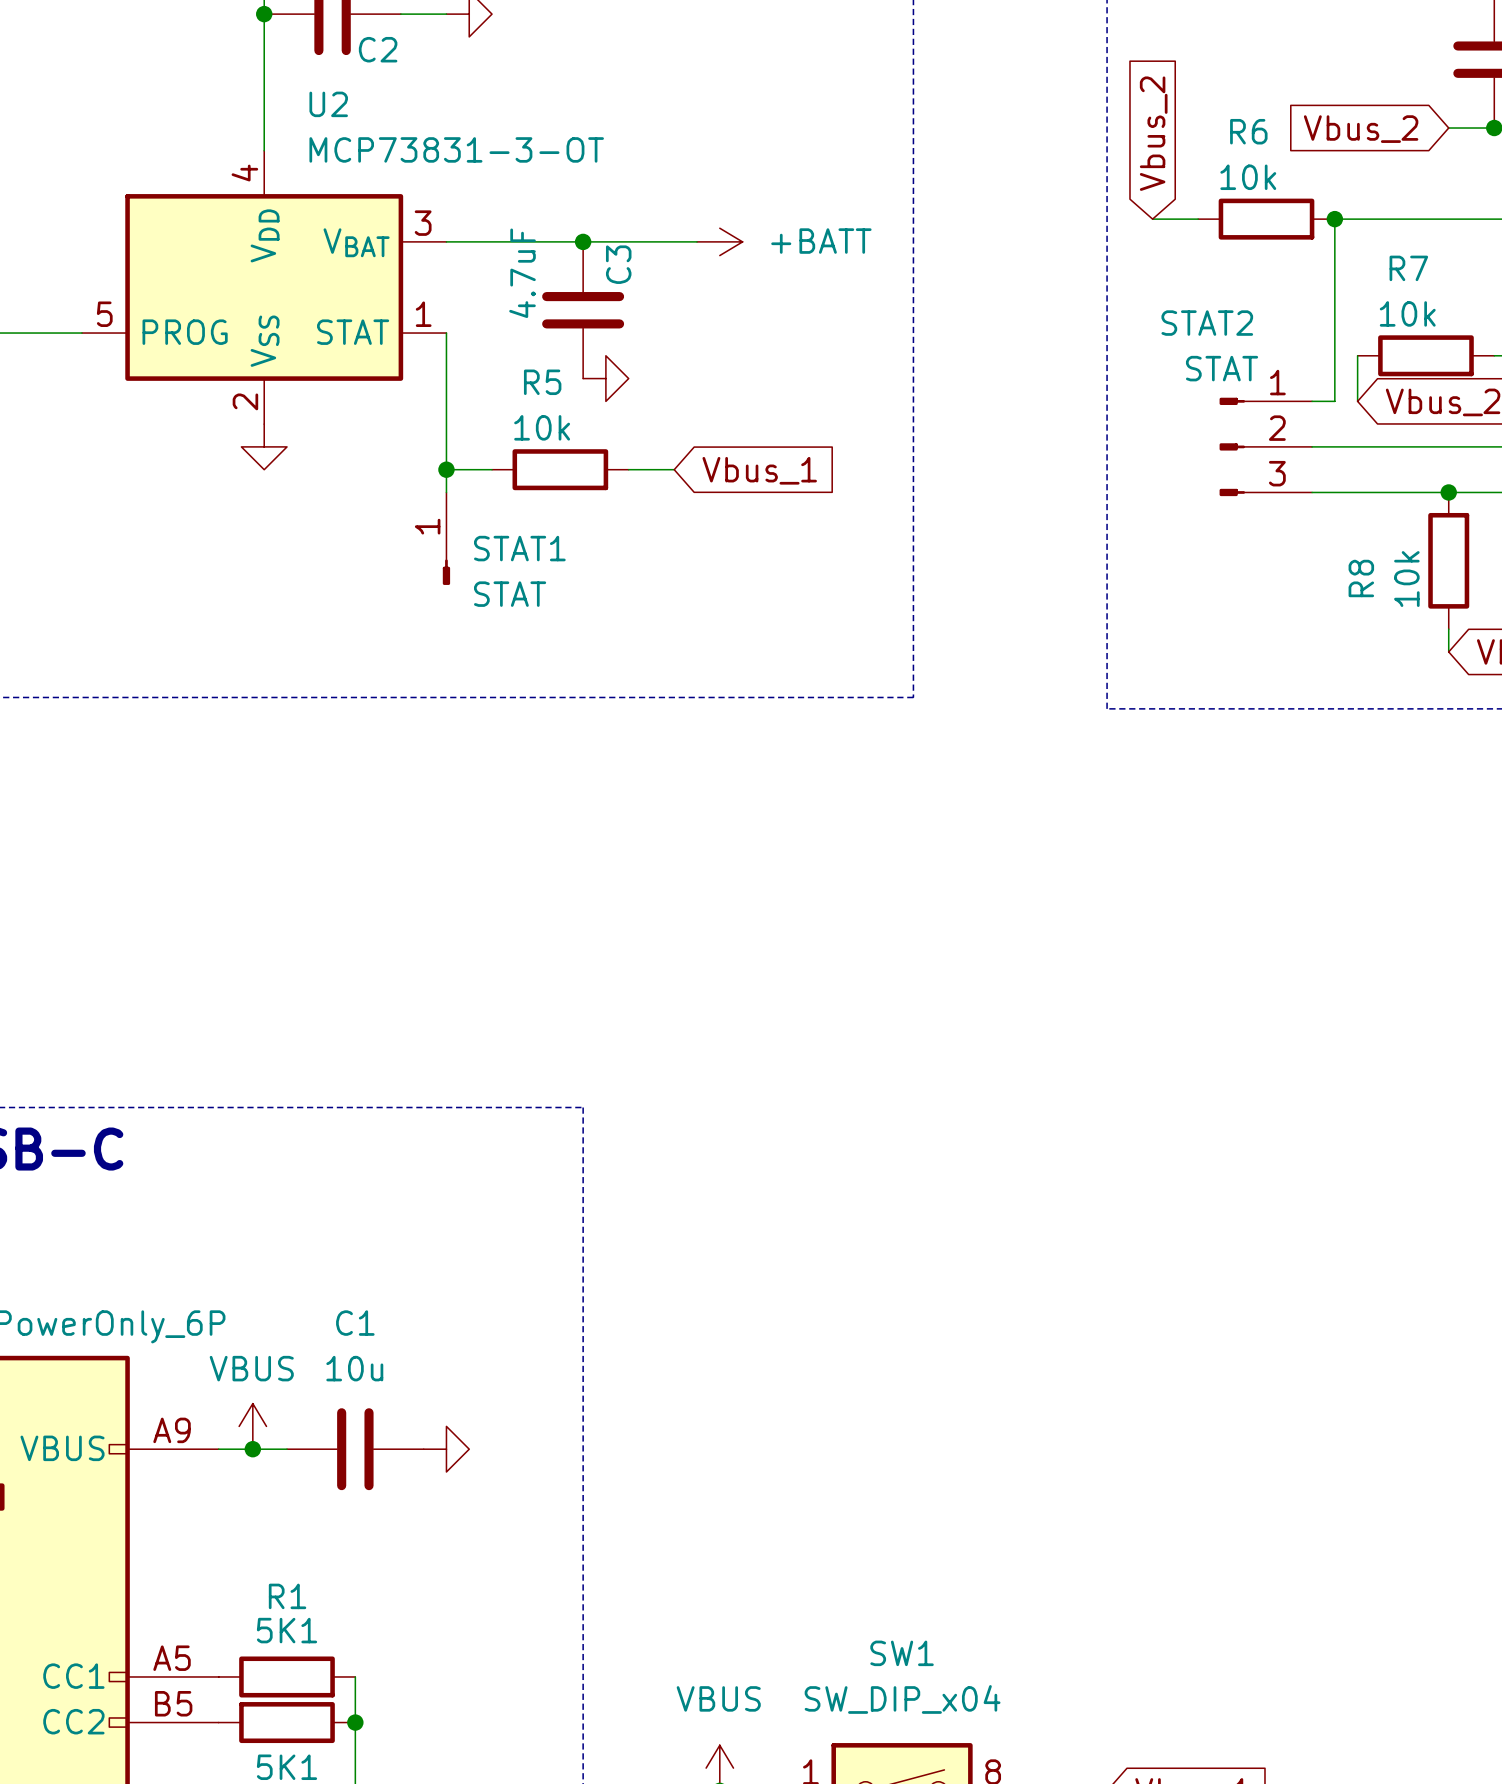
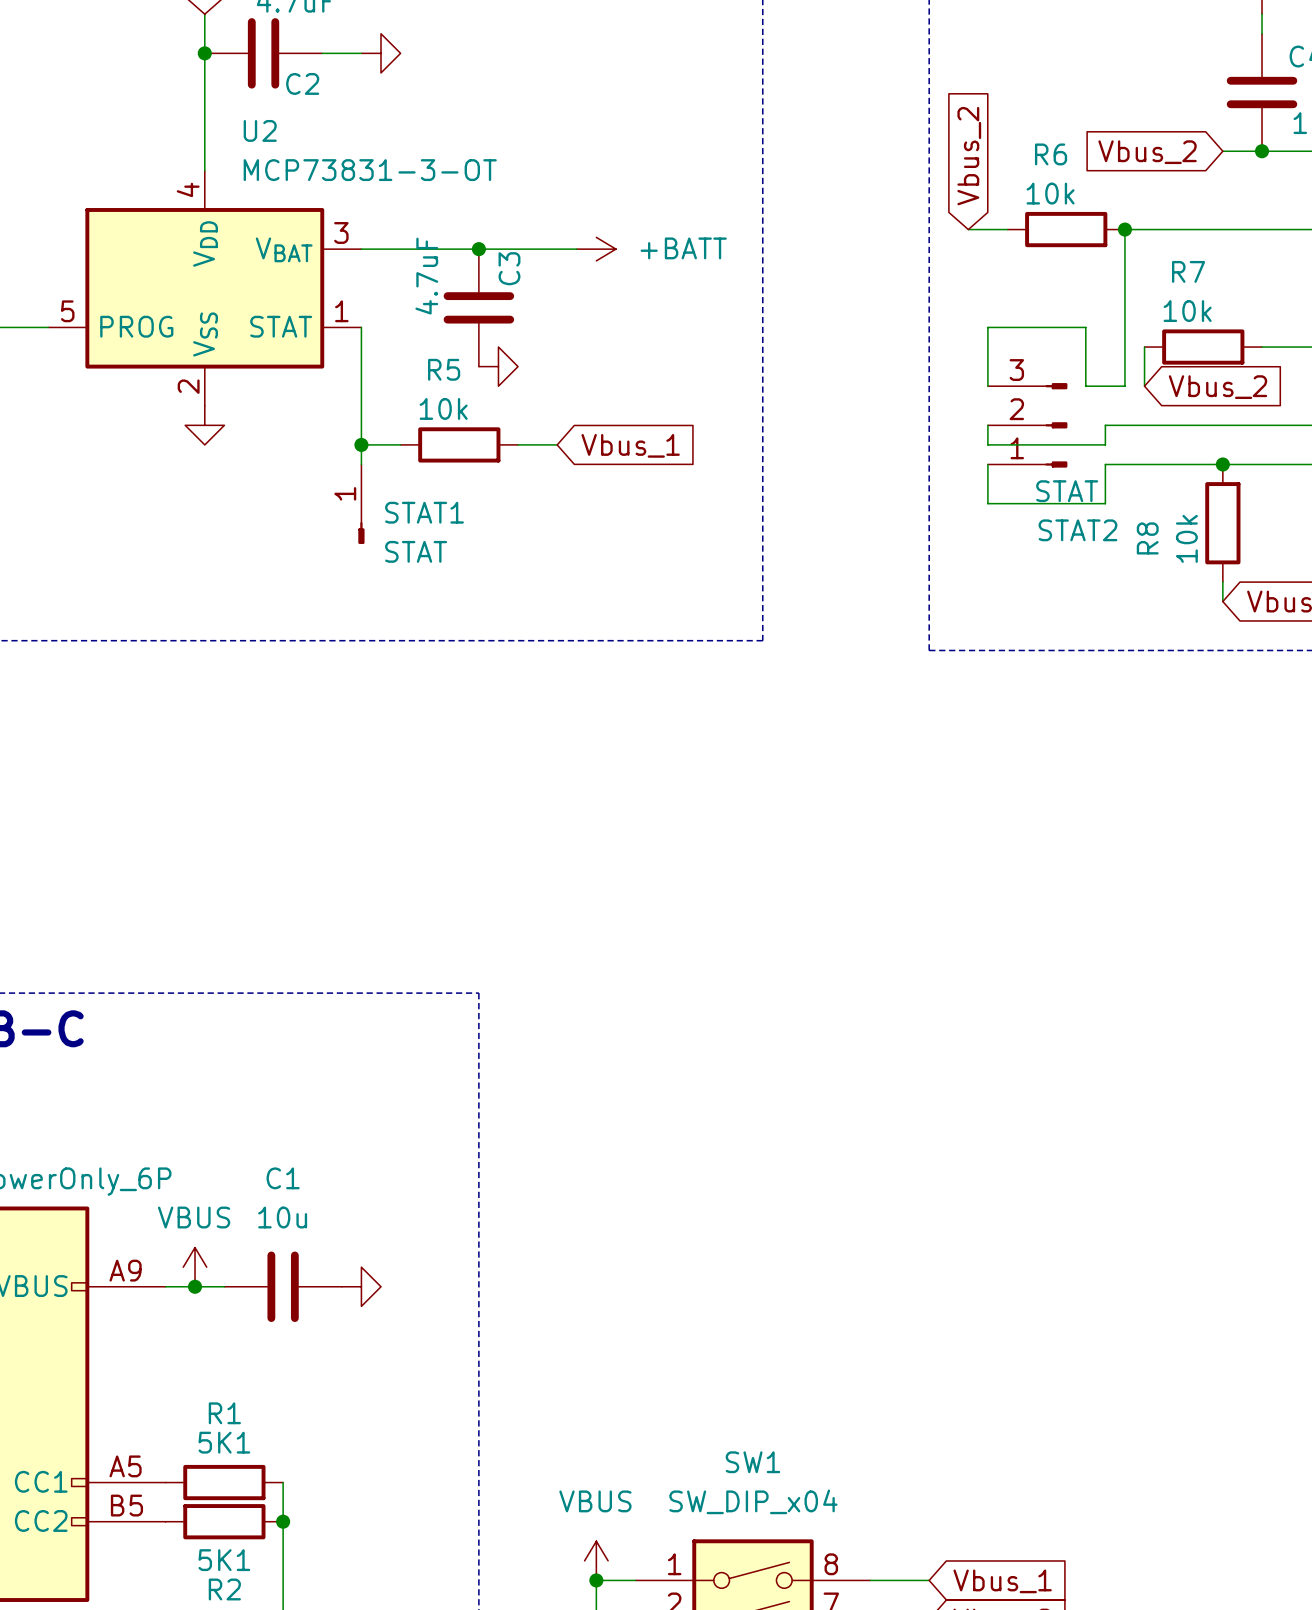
wire: none -> (987, 386) (987, 327) (1085, 327) (1085, 386) (1105, 386)
wire: none -> (987, 425) (987, 444) (1105, 444) (1105, 425)
STAT2 rotation: 0° (1232, 446) -> 180° (1056, 425)
wire: none -> (987, 464) (987, 503) (1105, 503) (1105, 464)

